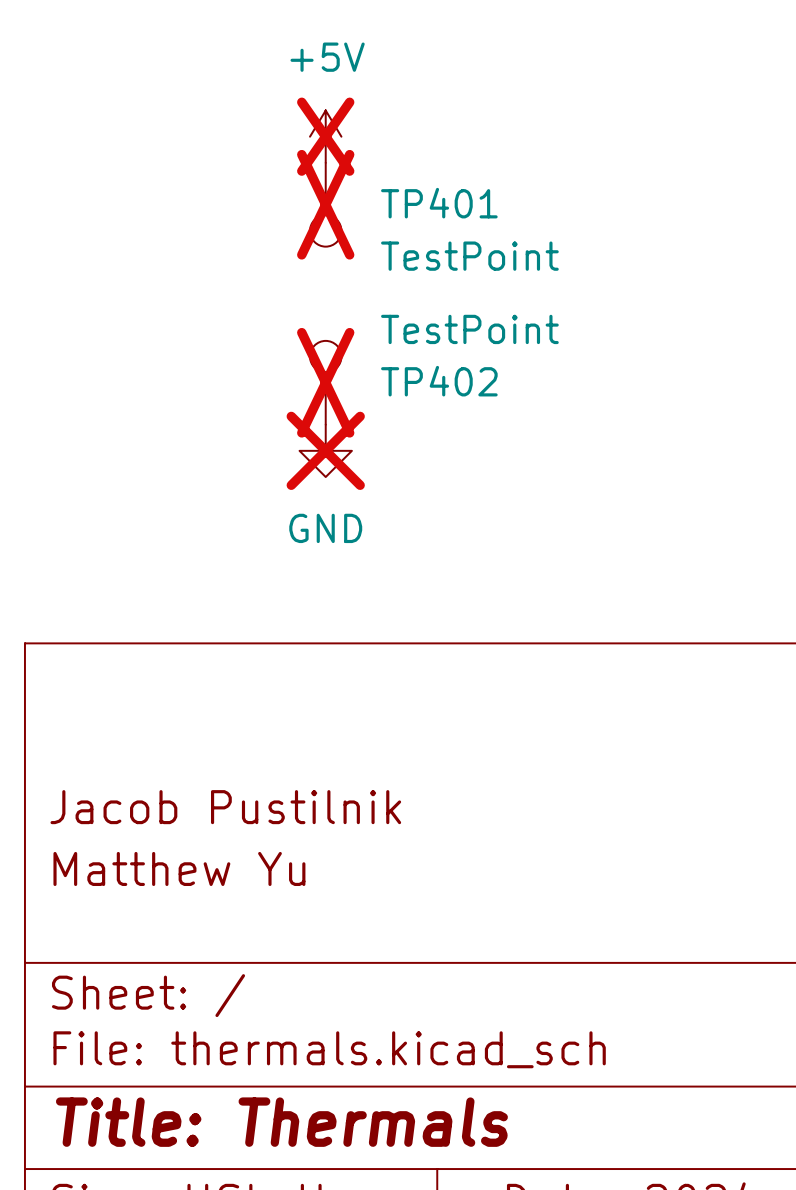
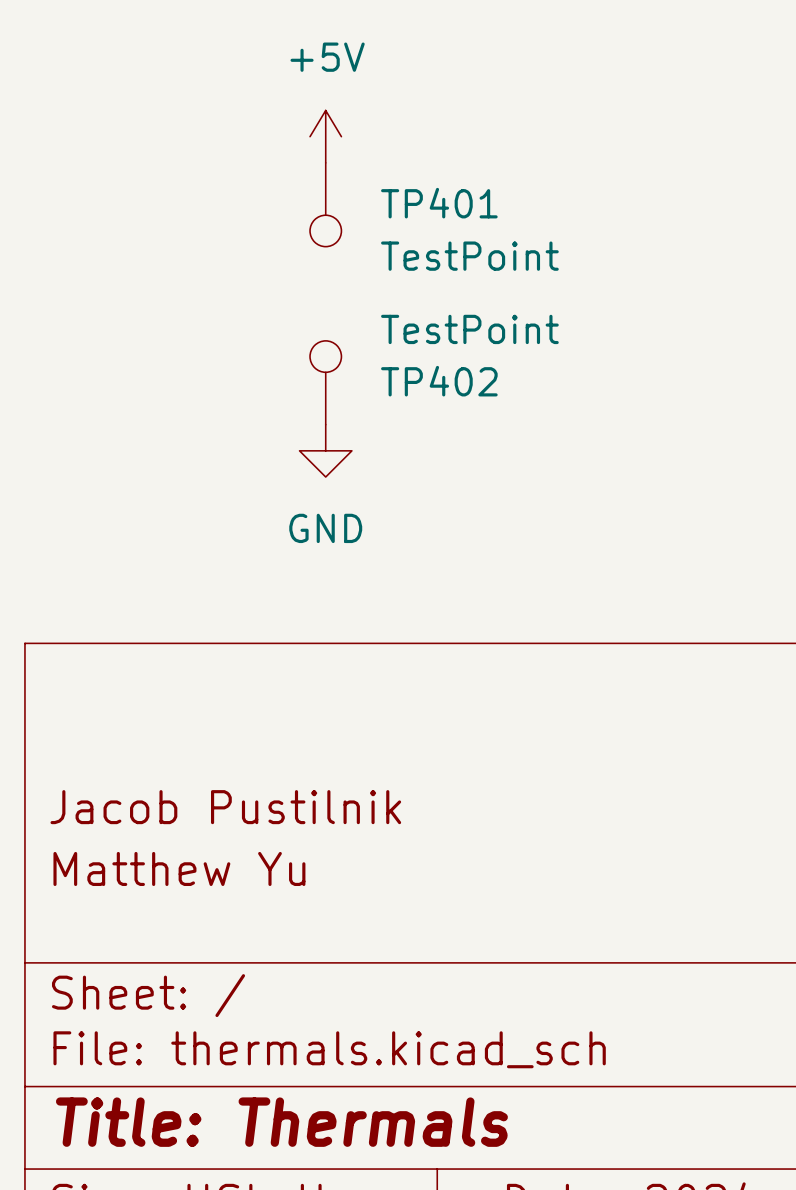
power symbol do-not-place cross: (325, 136) -> none
TP401 do-not-place cross: (325, 204) -> none
TP402 do-not-place cross: (325, 382) -> none
power symbol do-not-place cross: (325, 450) -> none

